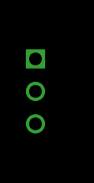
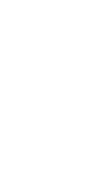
part: (35, 91) -> none

